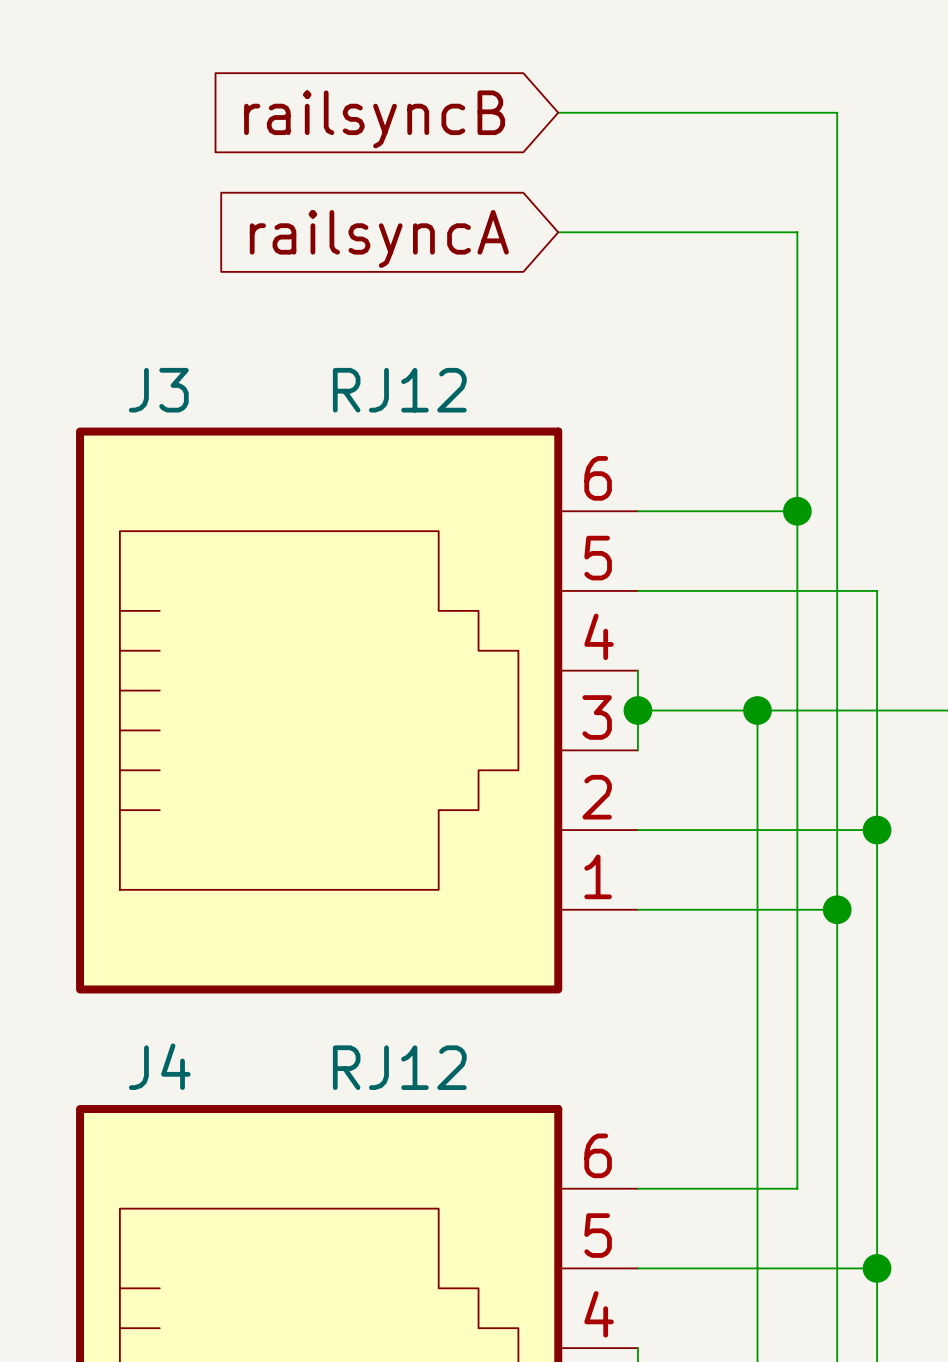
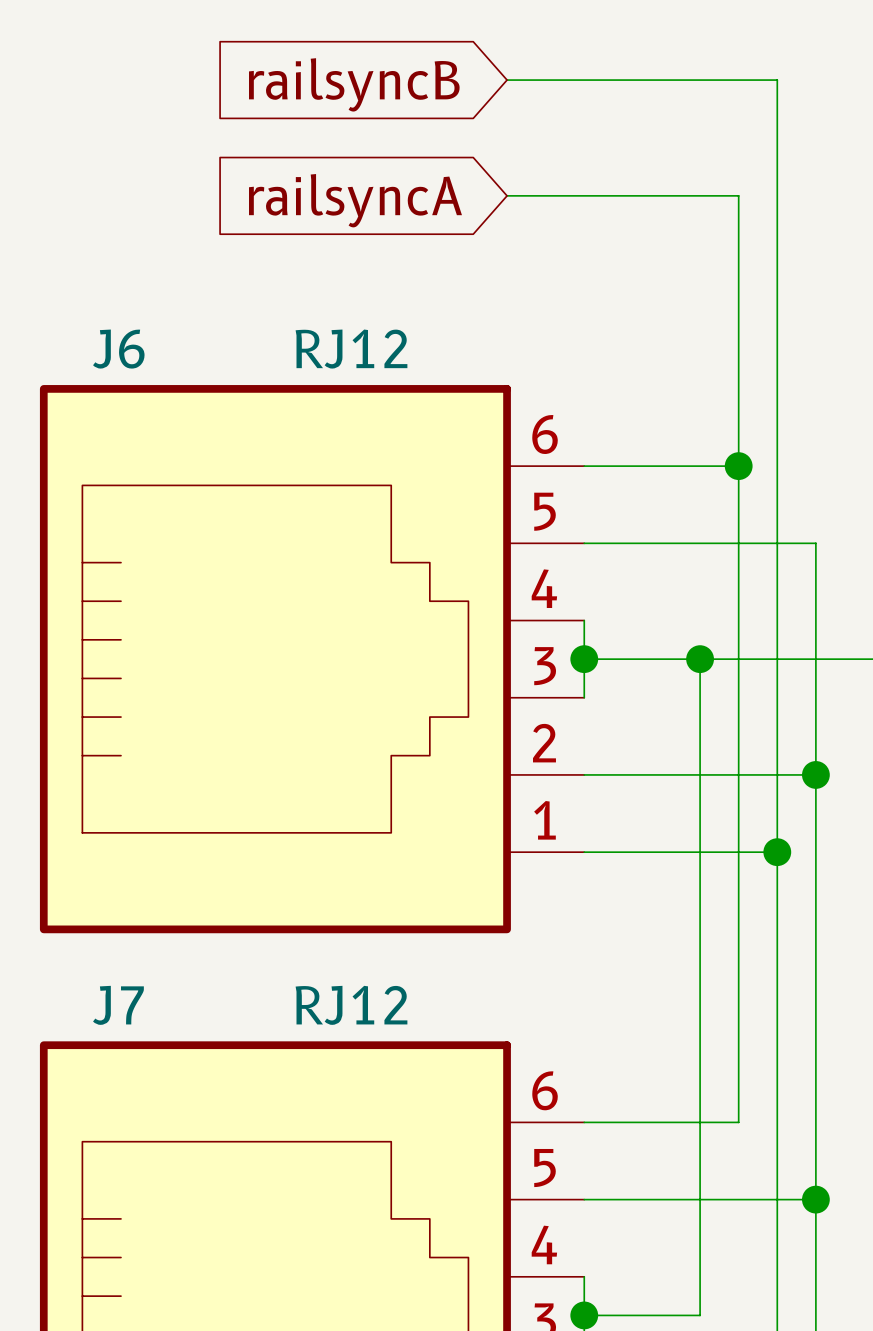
J3 name: J3 (158, 390) -> J6 (118, 349)
J4 name: J4 (159, 1066) -> J7 (118, 1005)

